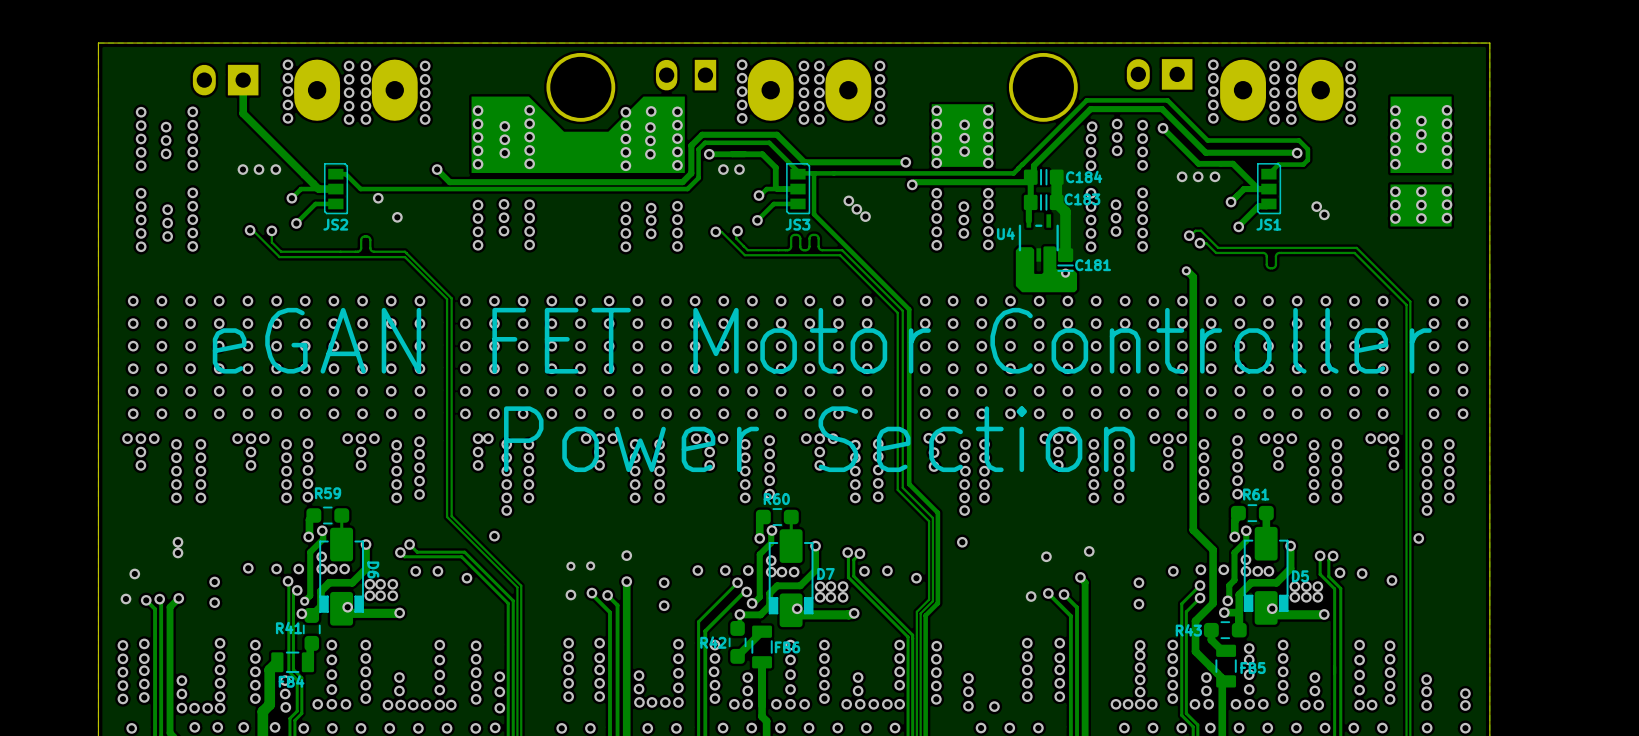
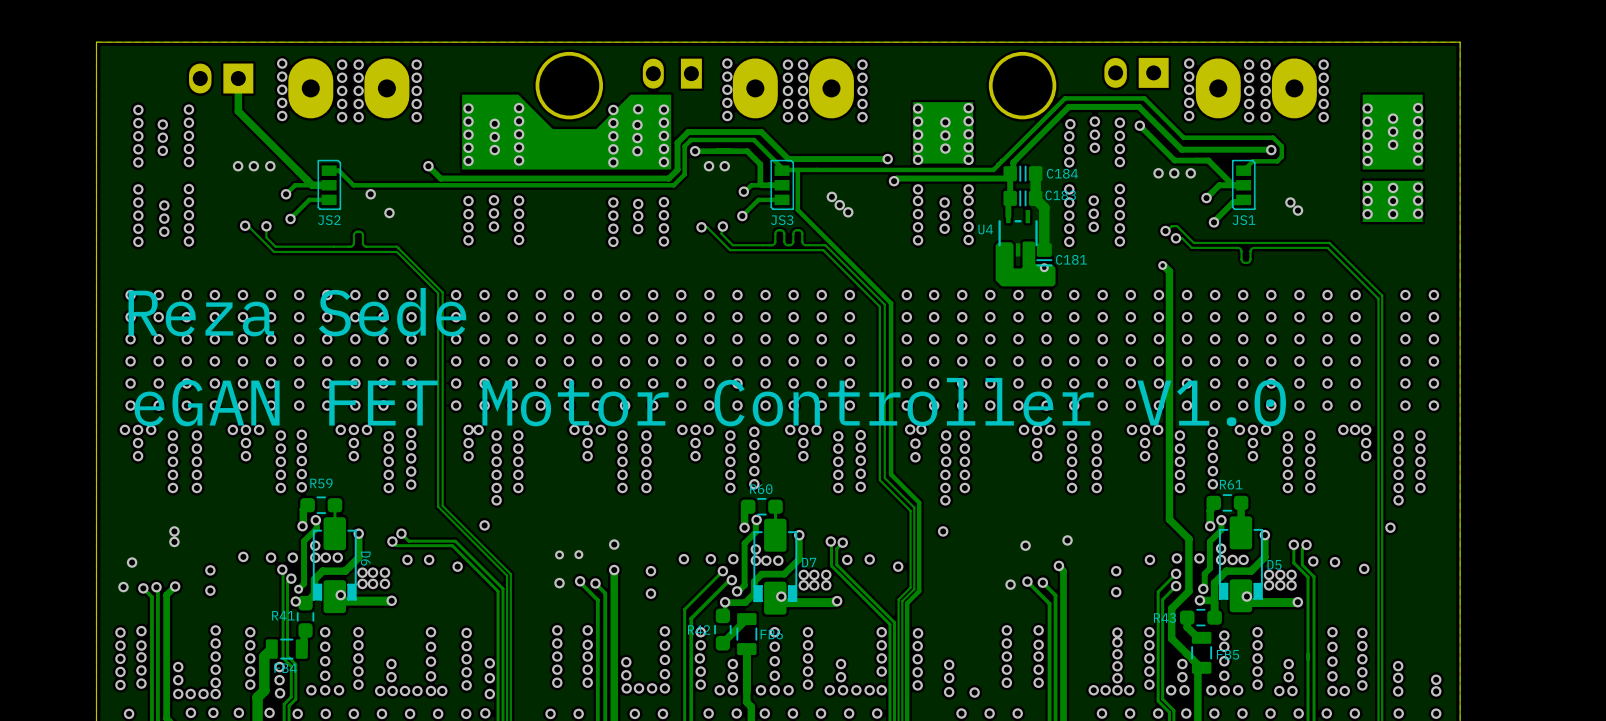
text: none -> Reza Sede (297, 312)
text: eGAN FET Motor Controller (822, 340) -> none
text: none -> eGAN FET Motor Controller V1.0 (710, 402)
text: Power Section (819, 439) -> none

